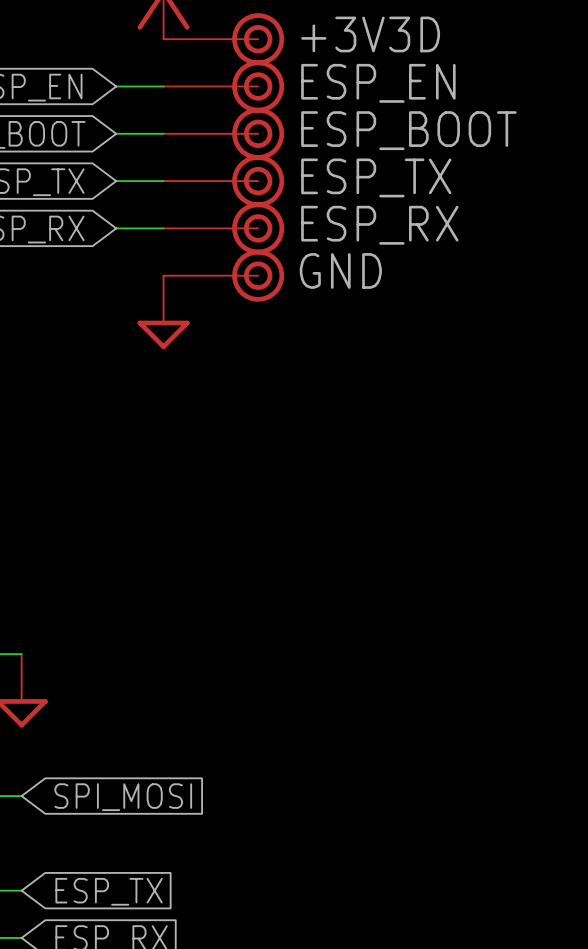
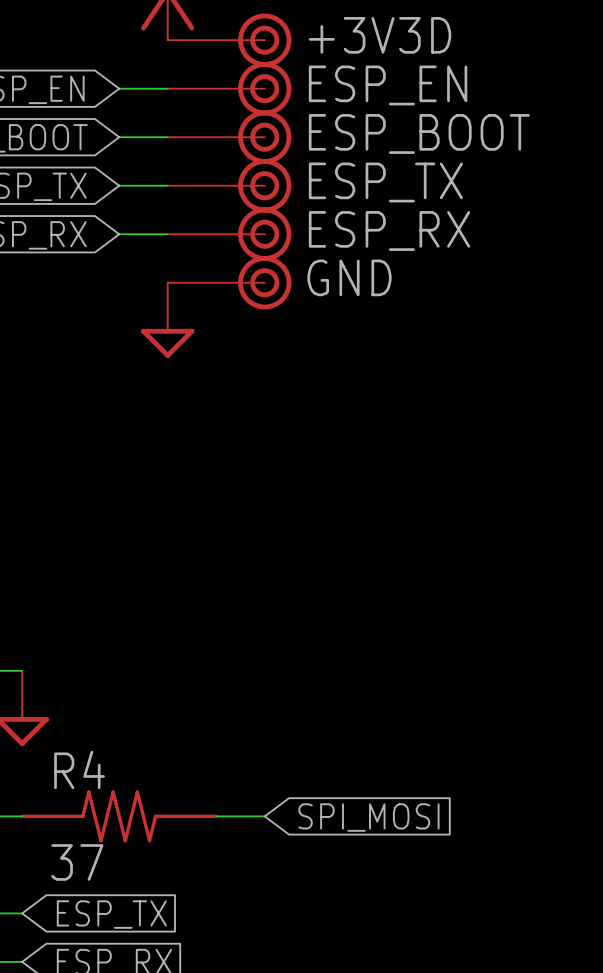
R4: none -> 37 (119, 816)
wire: none -> (216, 816) (264, 816)
global label position: SPI_MOSI (123, 797) -> SPI_MOSI (368, 817)

